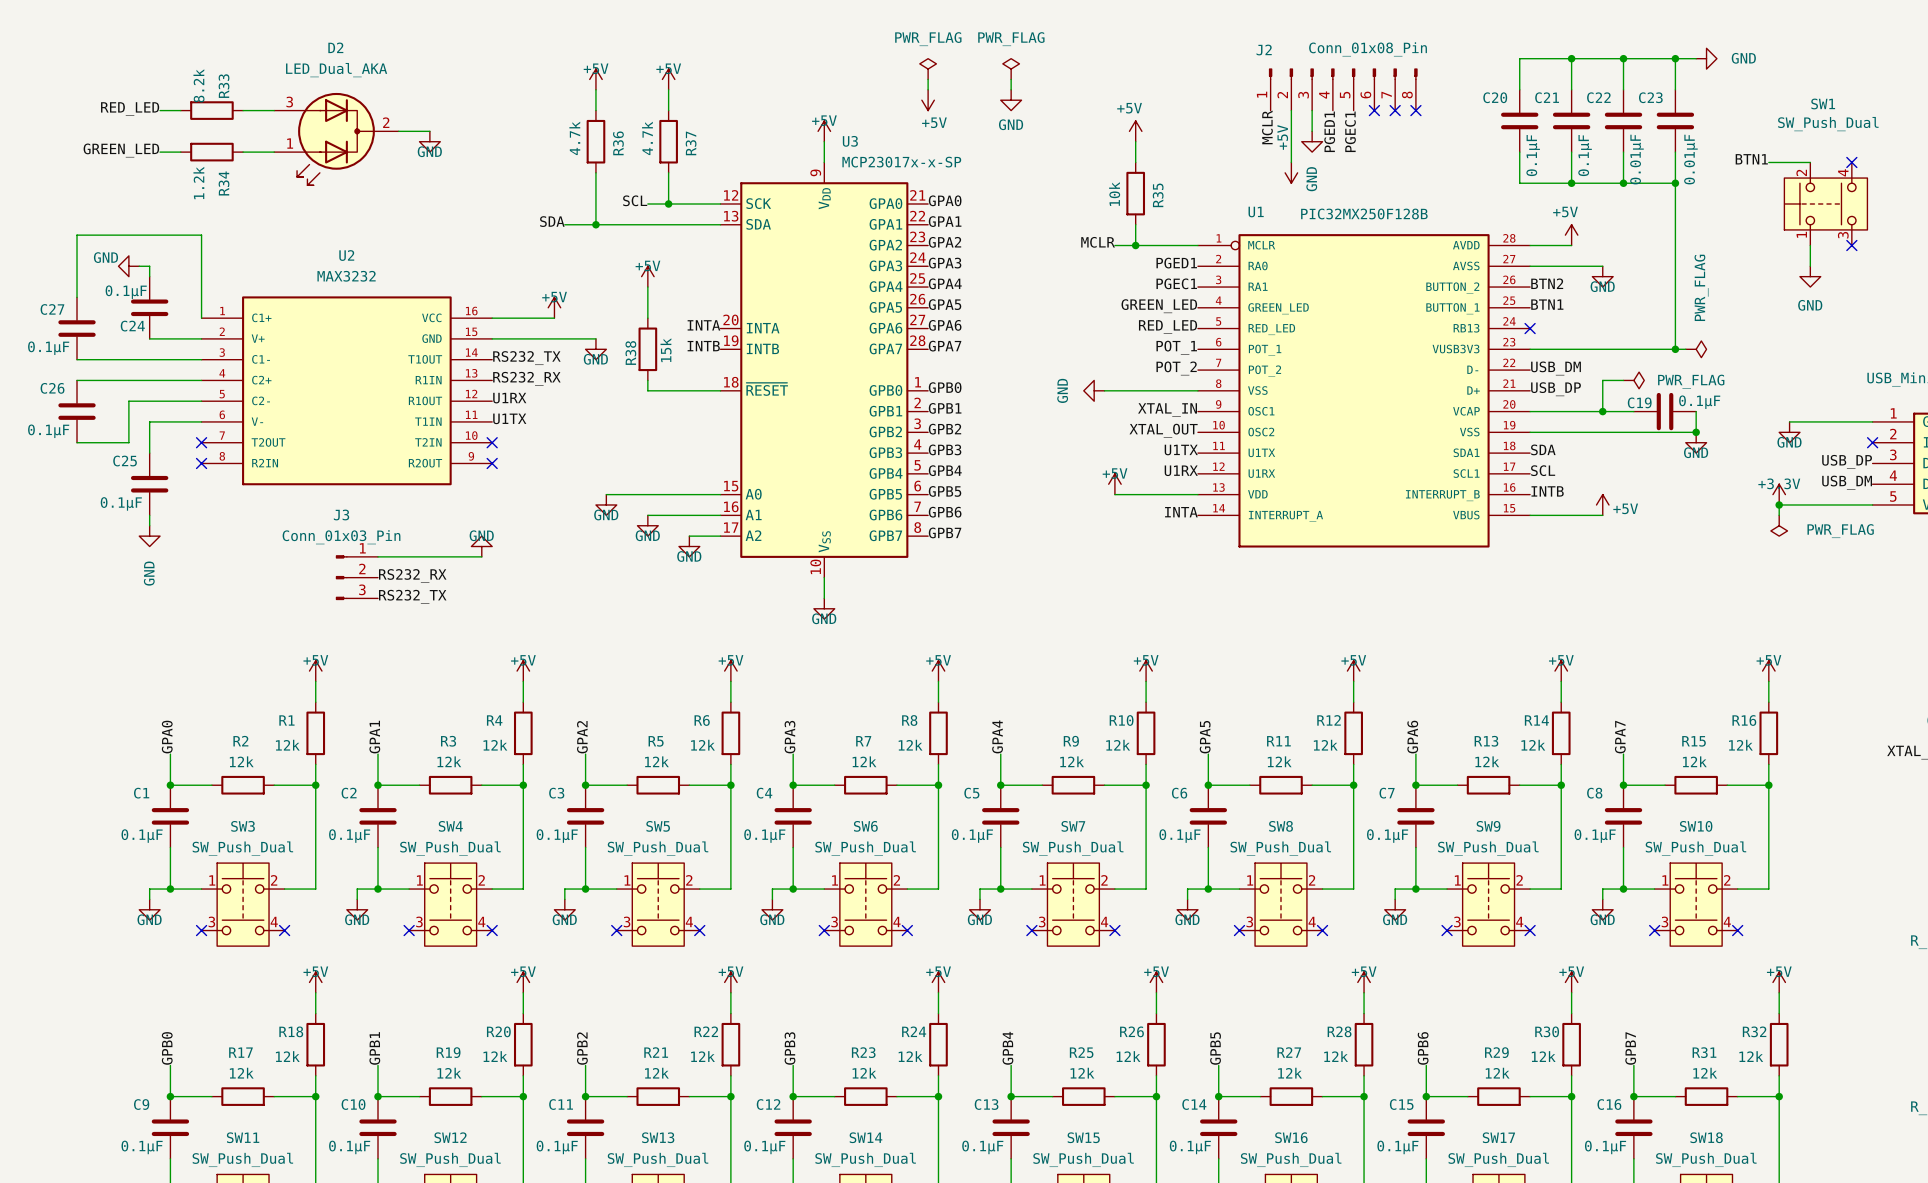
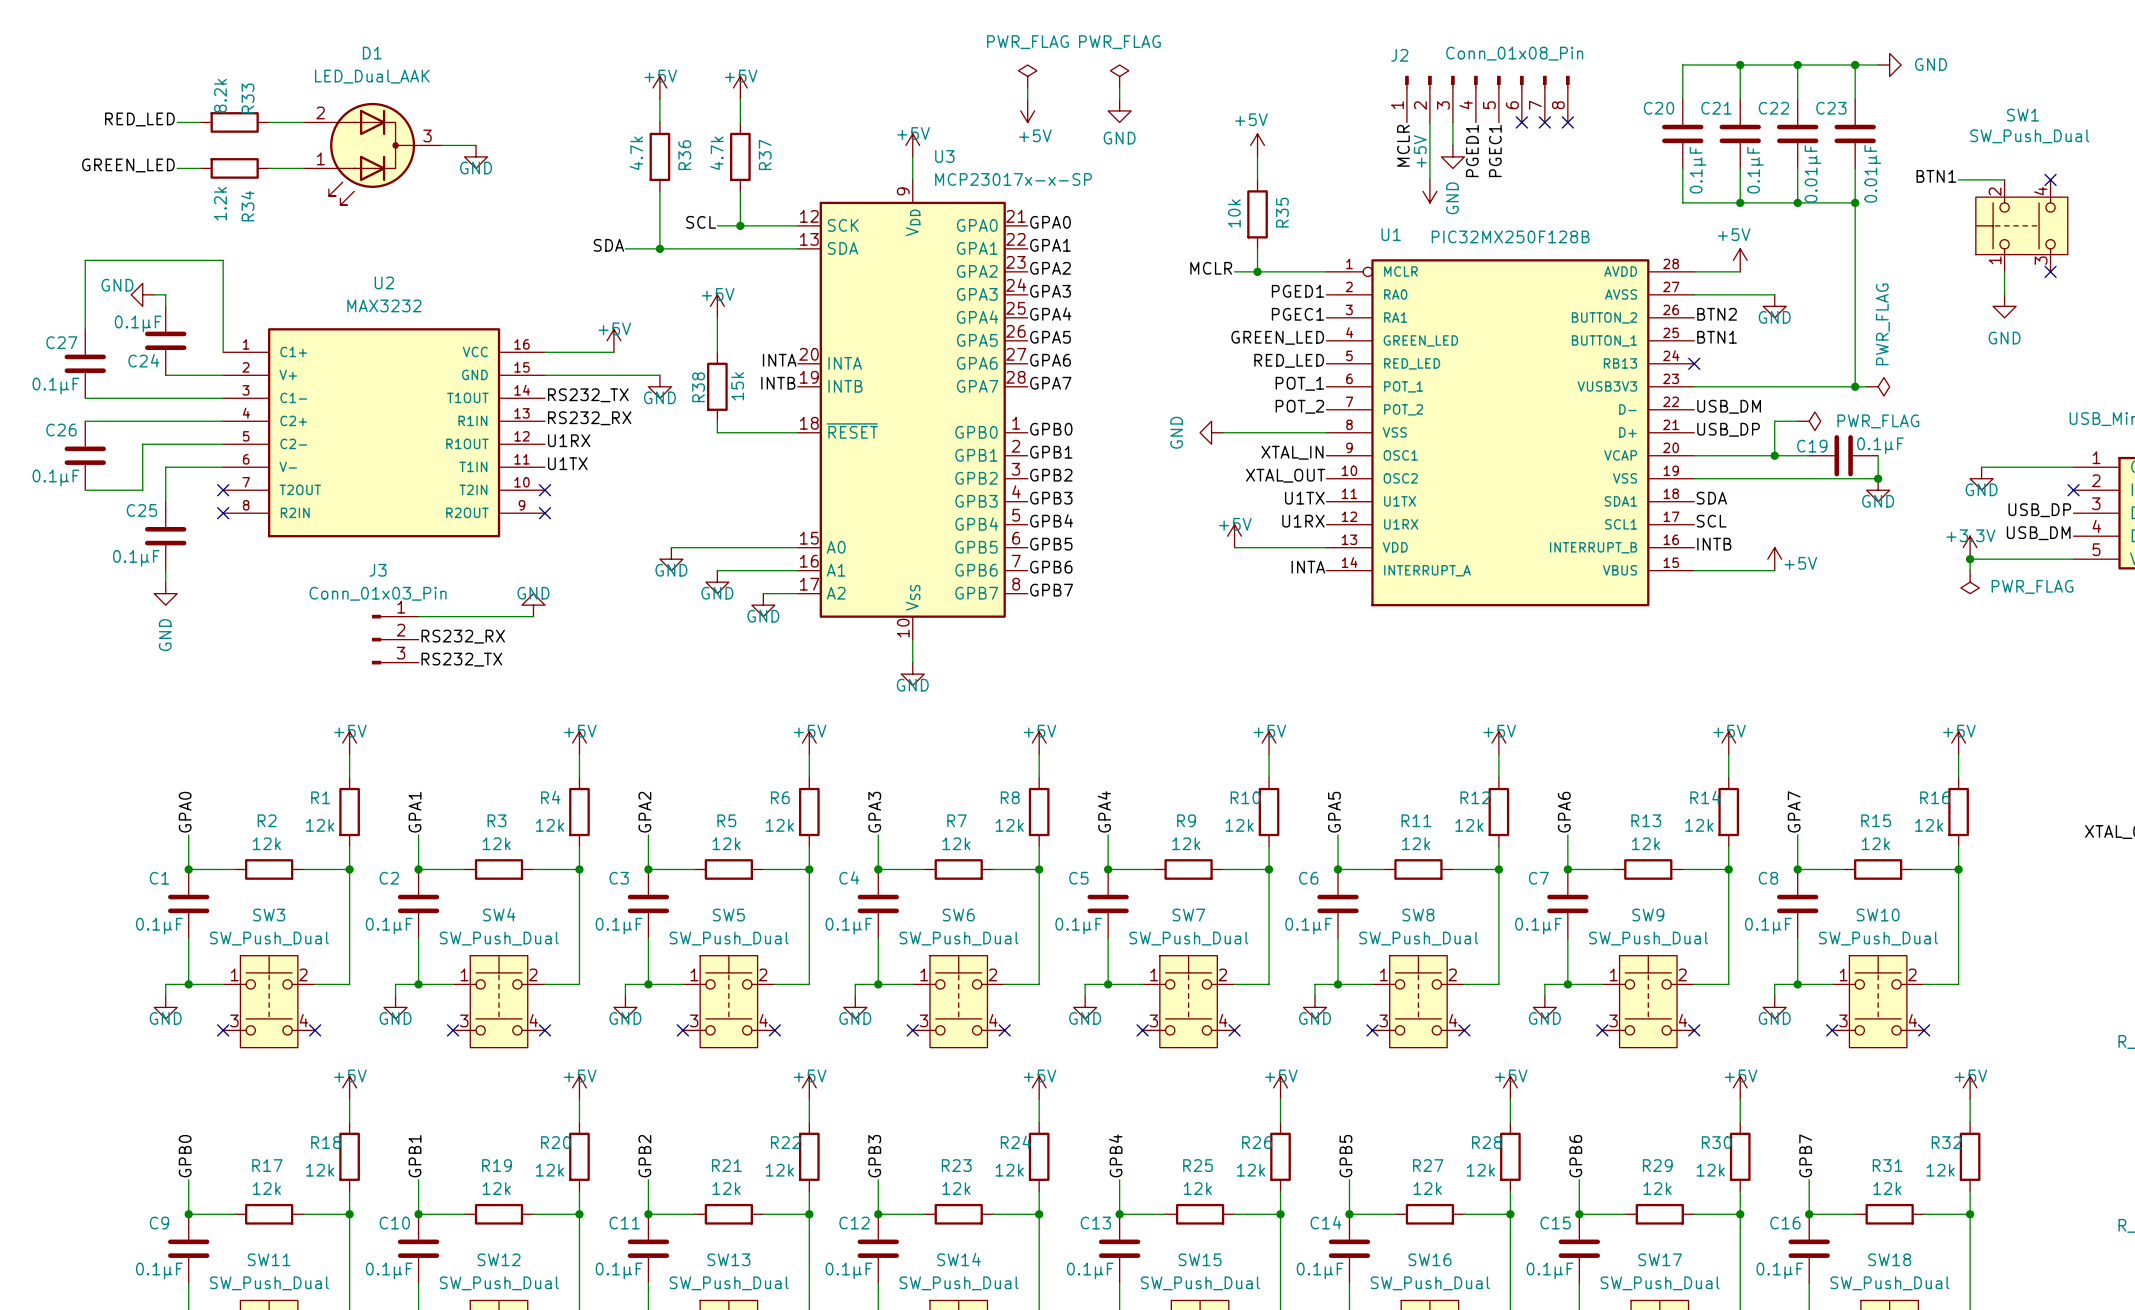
D2 name: D2 (335, 47) -> D1 (372, 53)
D2 value: LED_Dual_AKA (336, 70) -> LED_Dual_AAK (372, 76)
D2 pin number: 3 (289, 102) -> 2 (320, 112)
D2 pin number: 2 (386, 122) -> 3 (427, 135)

